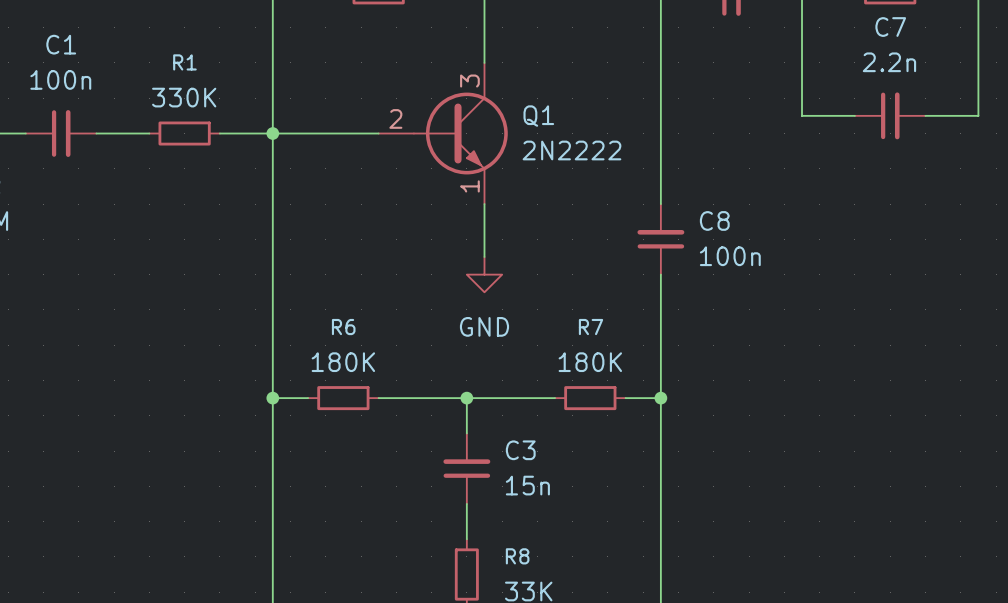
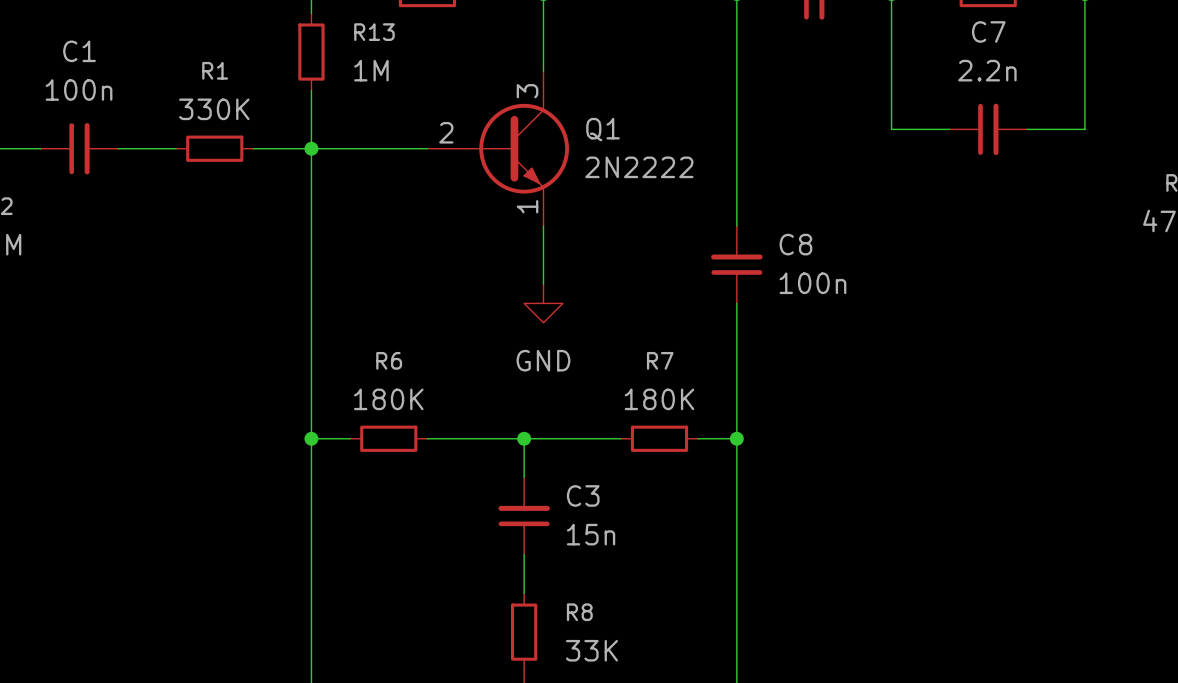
wire: (272, 10) (272, 80) -> none
R13: none -> 1M (311, 52)

